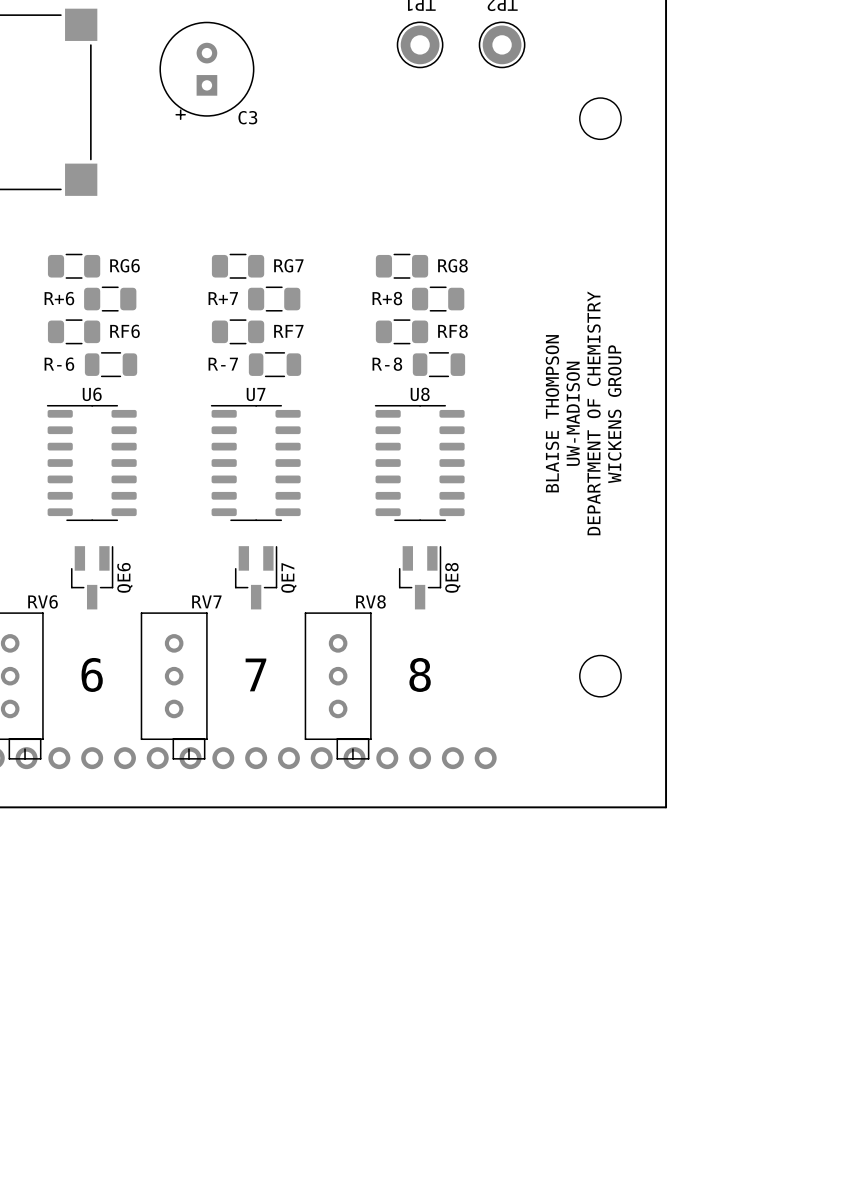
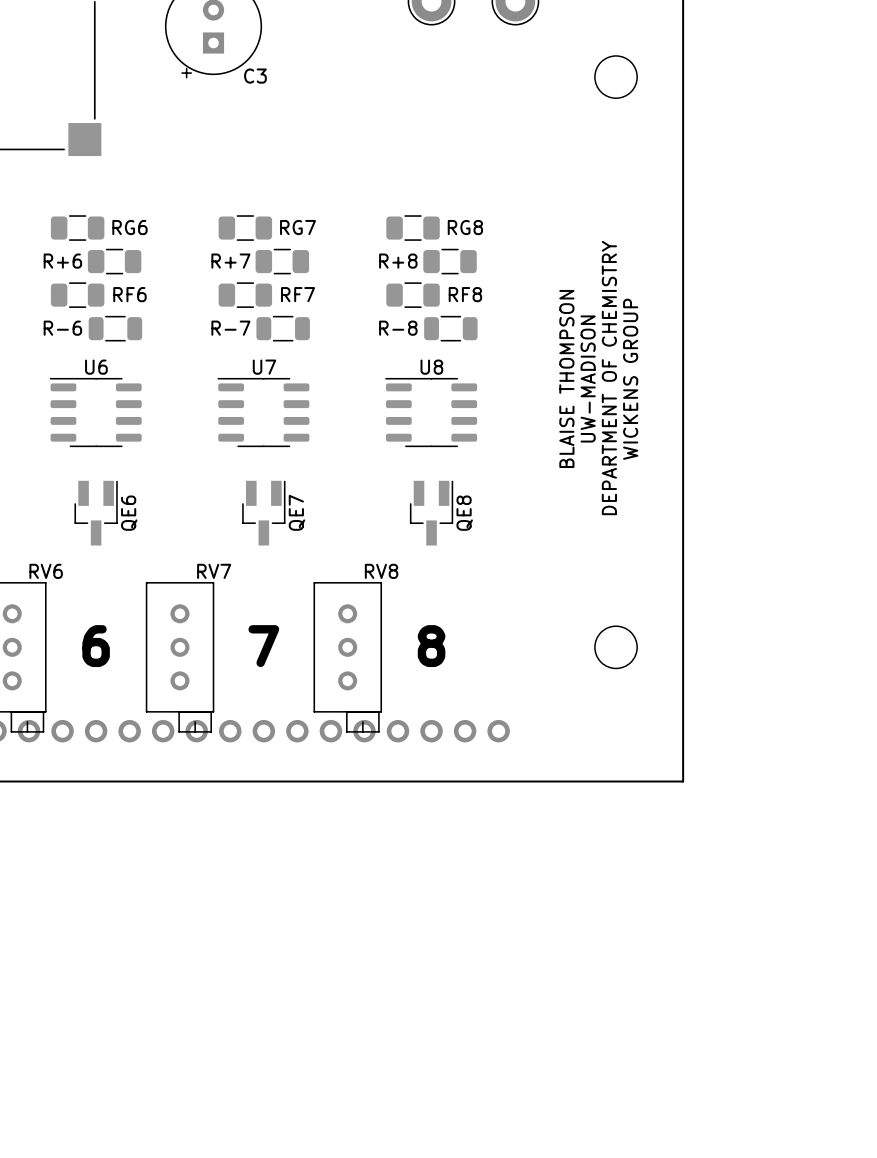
U6 footprint: [46, 404, 137, 522] -> [49, 377, 142, 448]
U7 footprint: [210, 404, 301, 522] -> [217, 377, 310, 448]
U8 footprint: [374, 404, 465, 522] -> [385, 377, 478, 448]
QE6 position: (92, 577) -> (96, 513)
QE7 position: (256, 577) -> (263, 513)
QE8 position: (420, 577) -> (431, 513)

